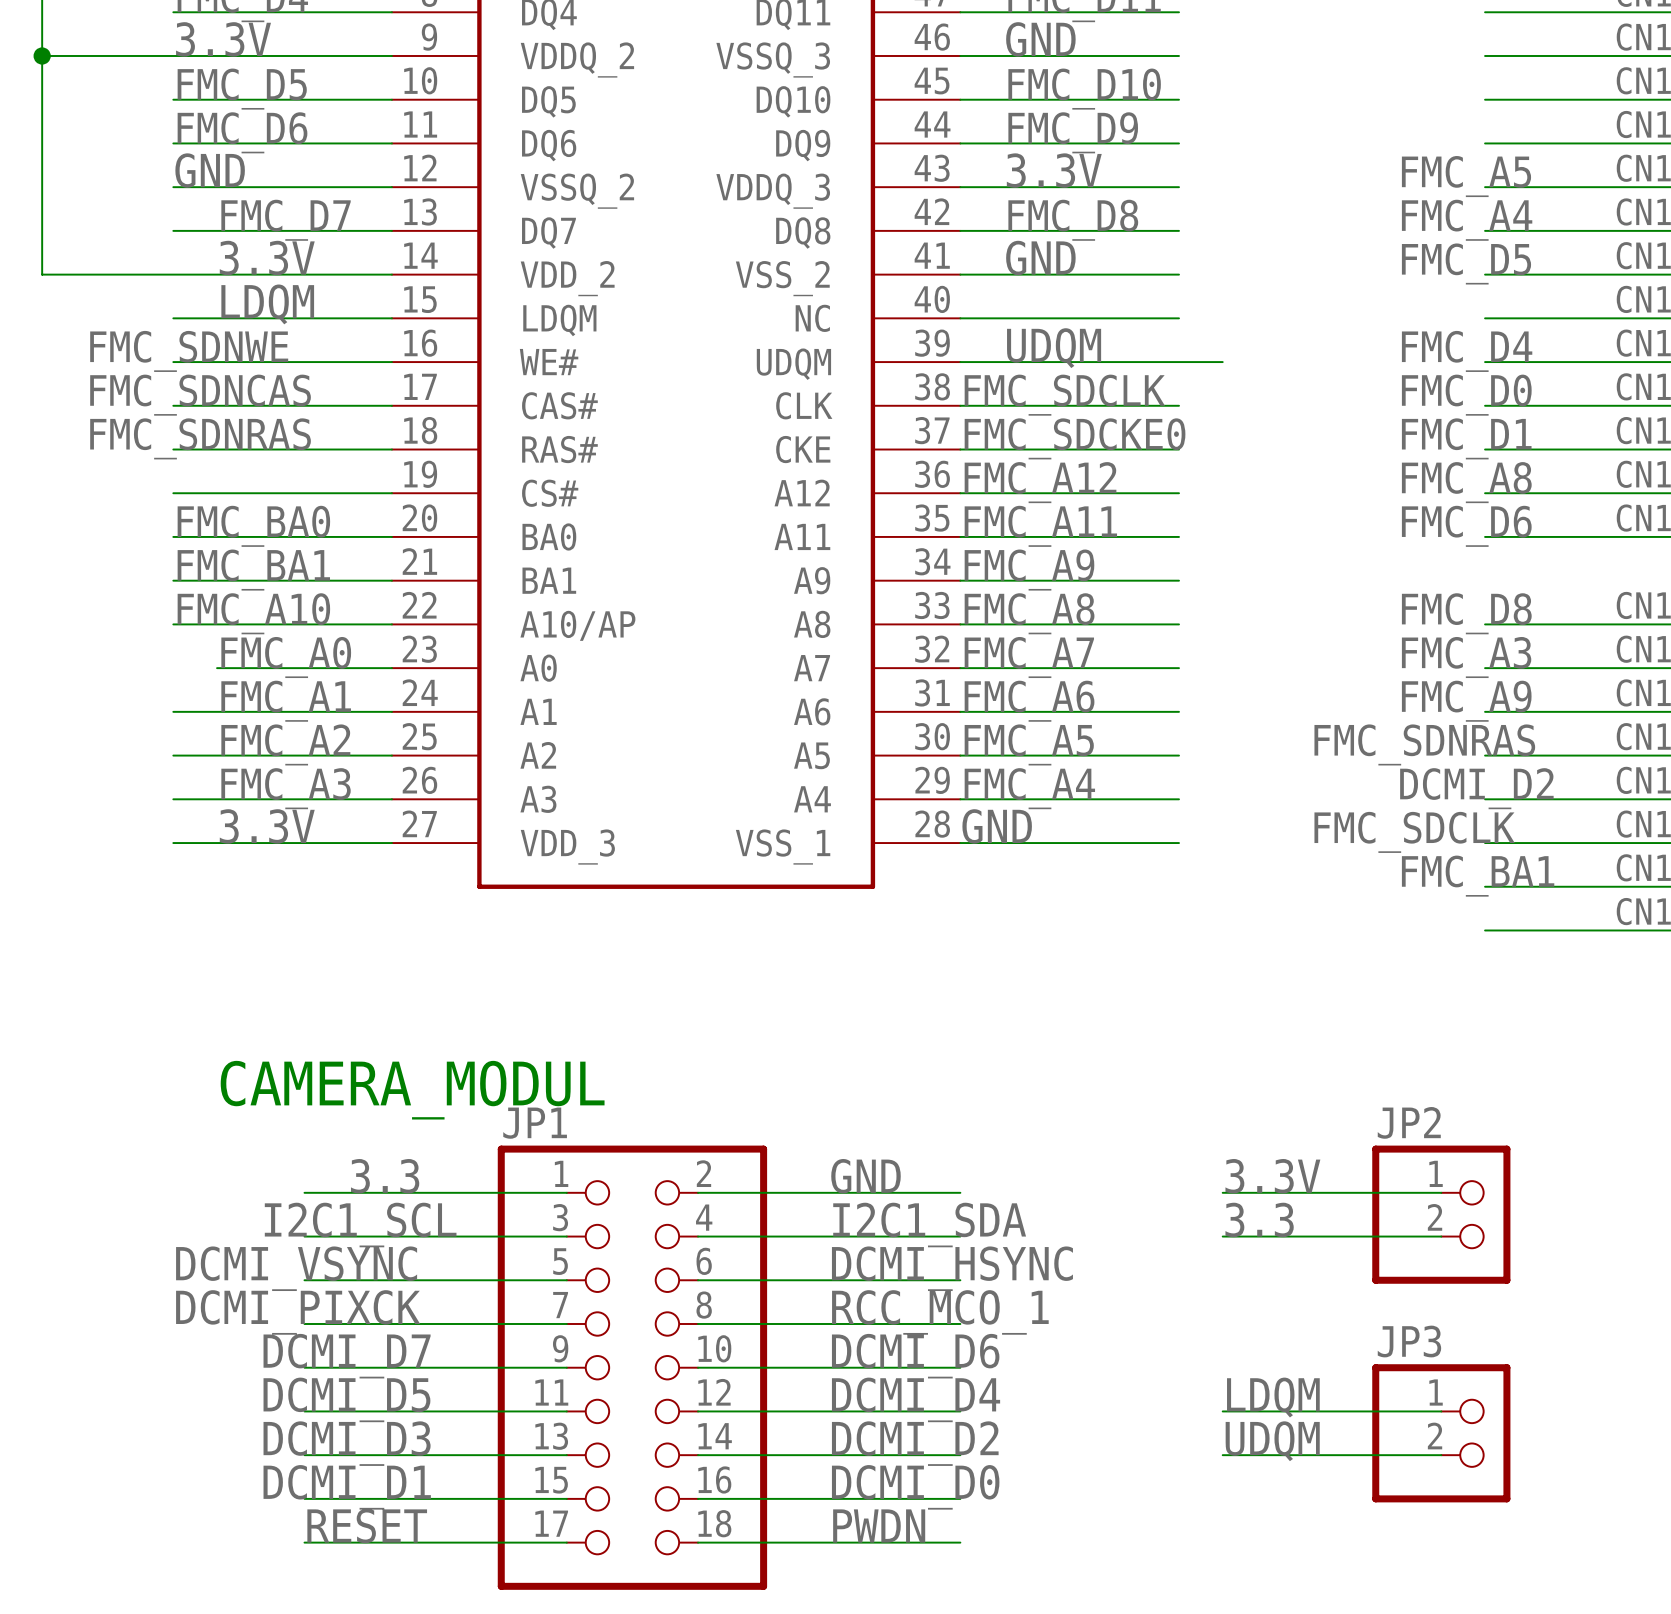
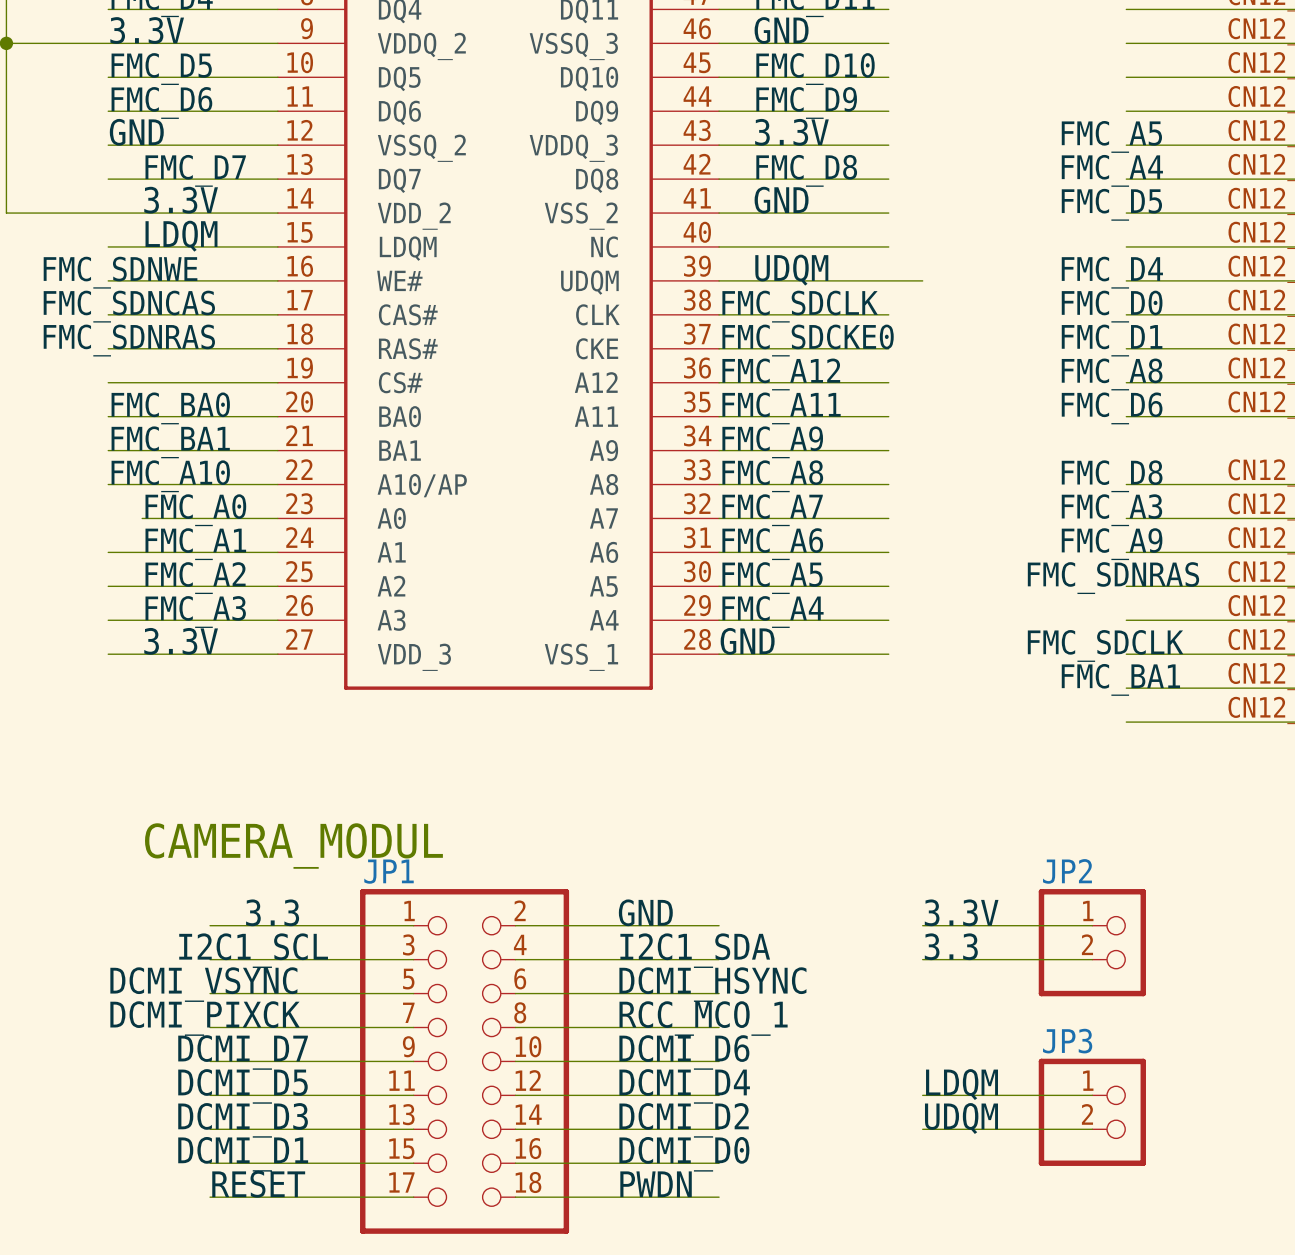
label position: FMC_SDNRAS (1424, 744) -> FMC_SDNRAS (1113, 578)
label: DCMI_D2 (1476, 788) -> none
label position: FMC_SDCLK (1414, 832) -> FMC_SDCLK (1105, 645)

